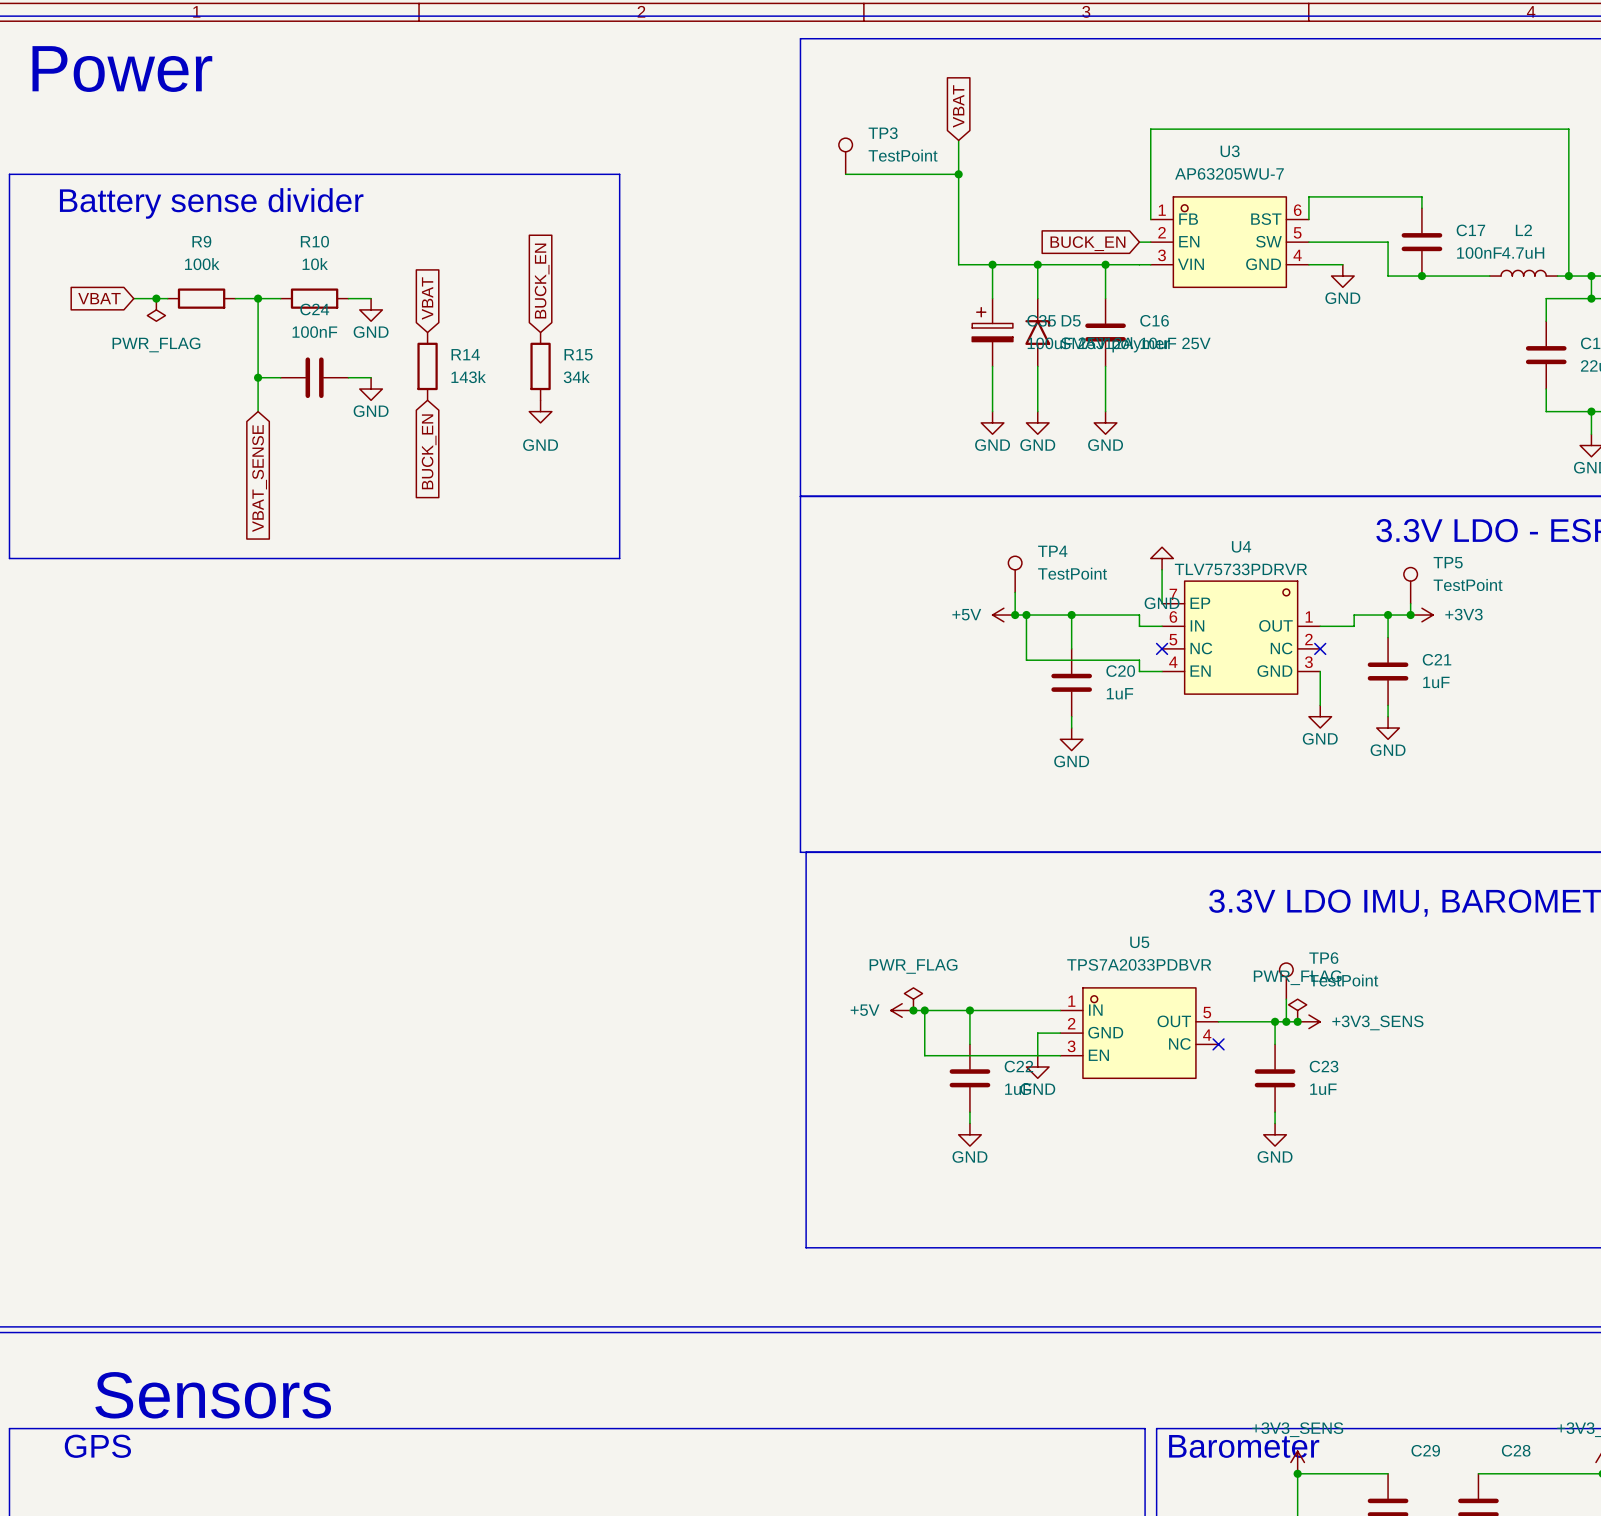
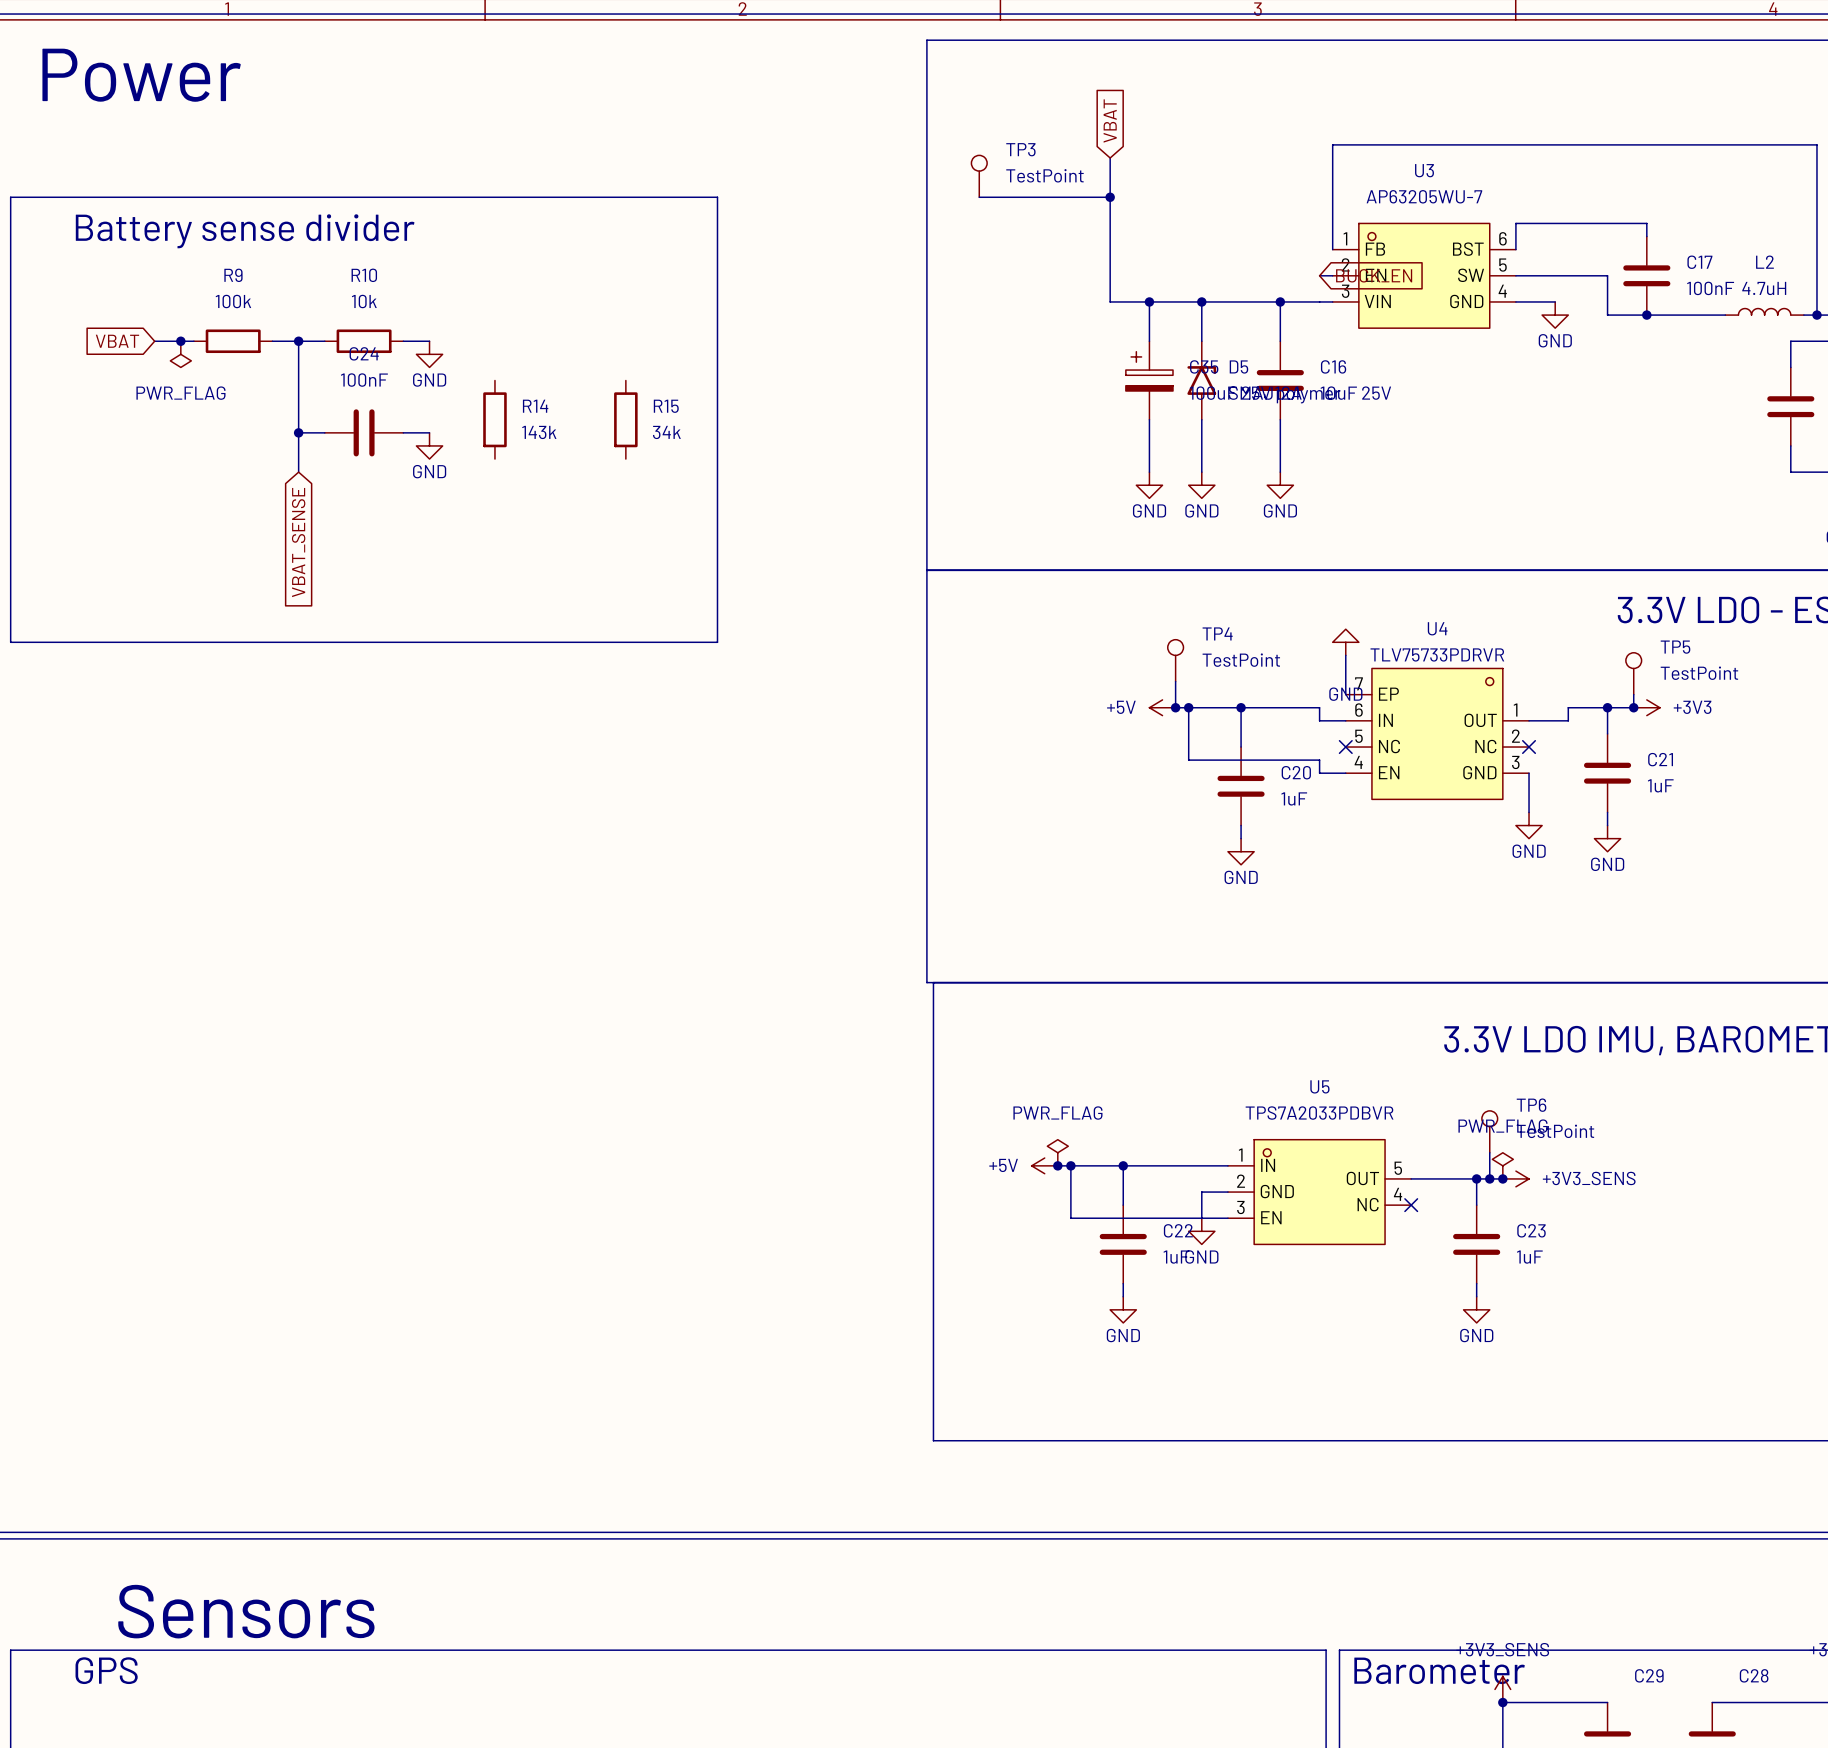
global label rotation: 0° (1087, 243) -> 180° (1374, 275)
global label: BUCK_EN (542, 281) -> none
global label: VBAT (427, 298) -> none
power symbol: GND (540, 411) -> none
global label: BUCK_EN (429, 451) -> none

